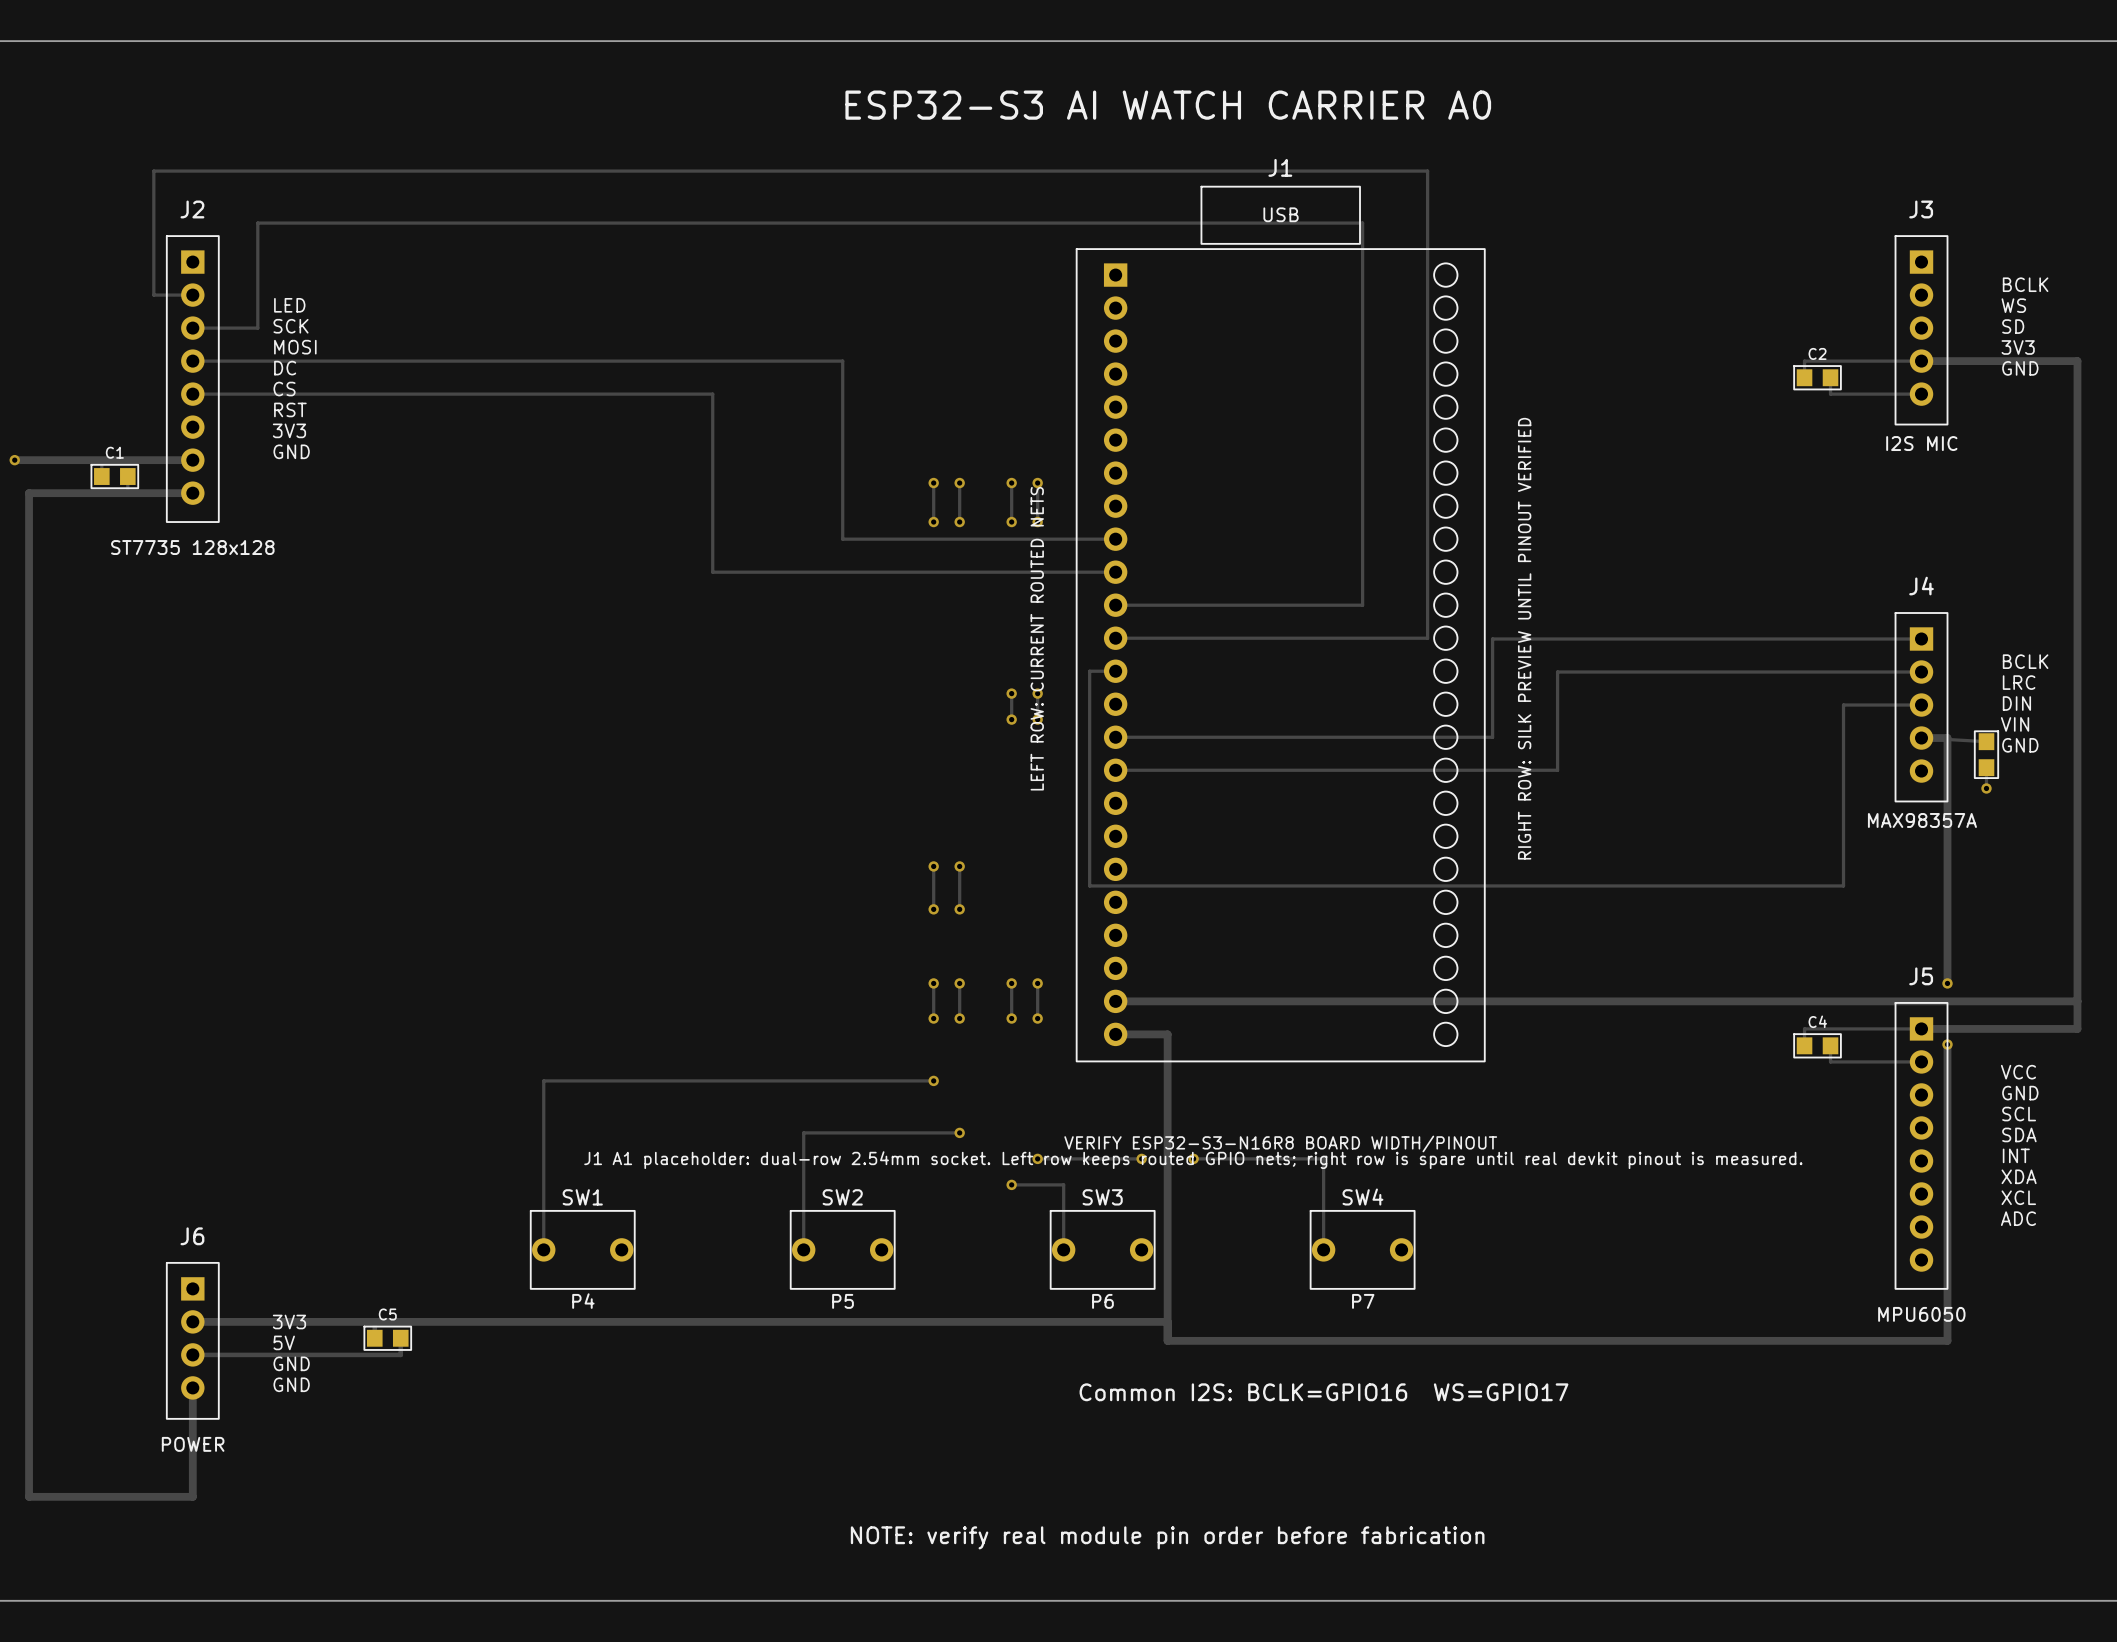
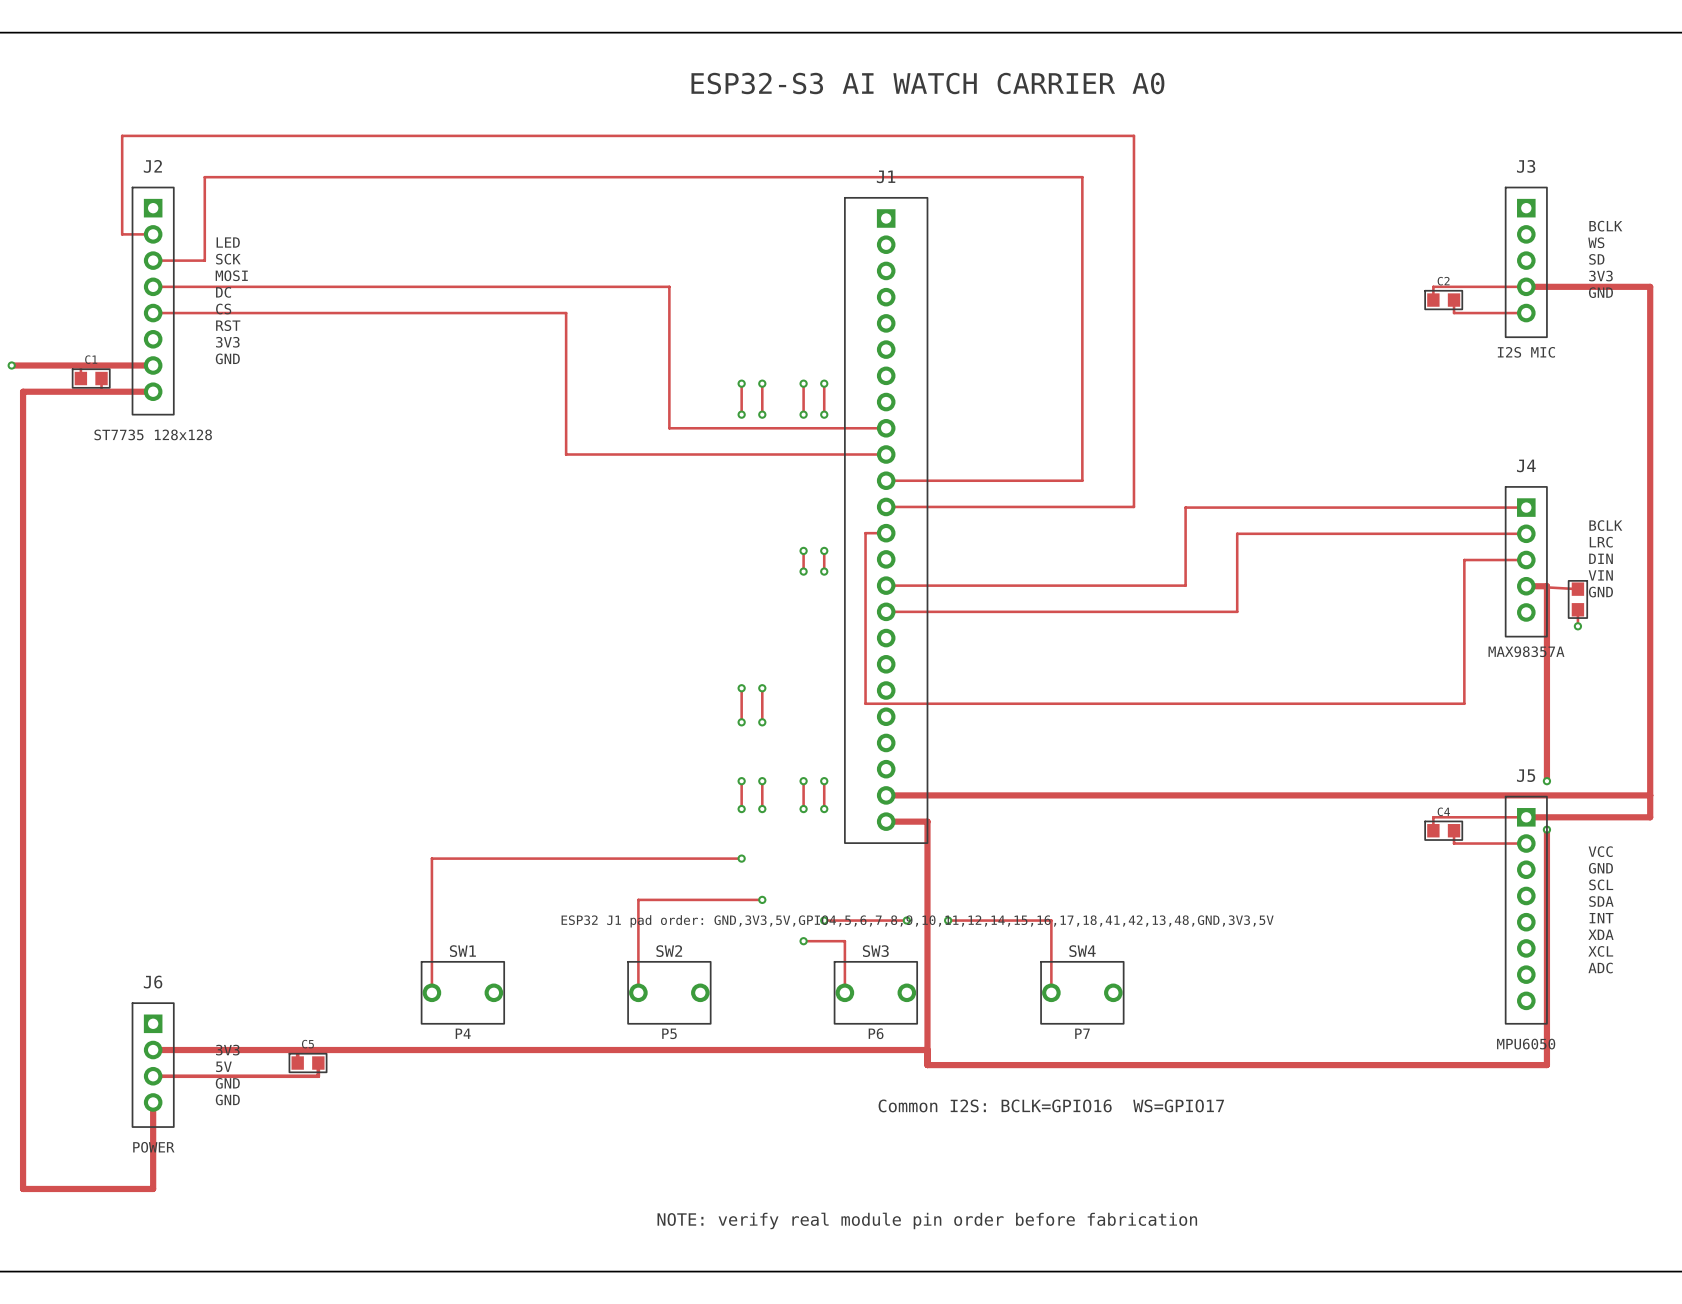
J1 footprint: [1075, 185, 1486, 1063] -> [844, 197, 929, 844]
text: none -> ESP32 J1 pad order: GND,3V3,5V,GPIO4,5,6,7,8,9,10,11,12,14,15,16,17,18,41,42,13,48,GND,3V3,5V (917, 921)
text: J1 A1 placeholder: dual-row 2.54mm socket. Left row keeps routed GPIO nets; right row is spare until real devkit pinout is measured. (1193, 1160) -> none

